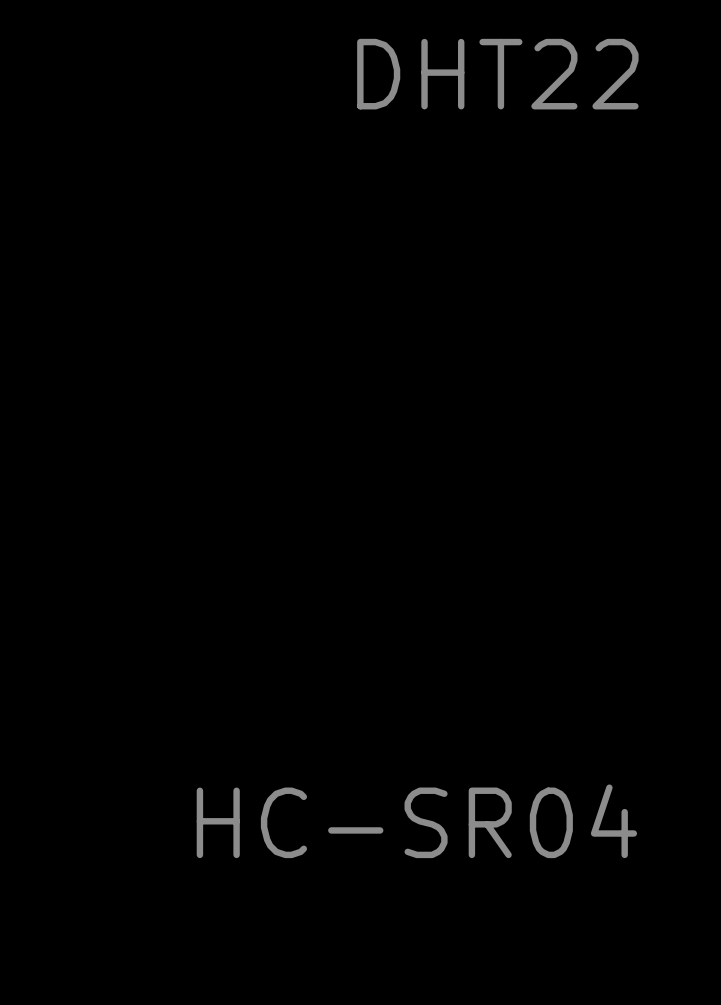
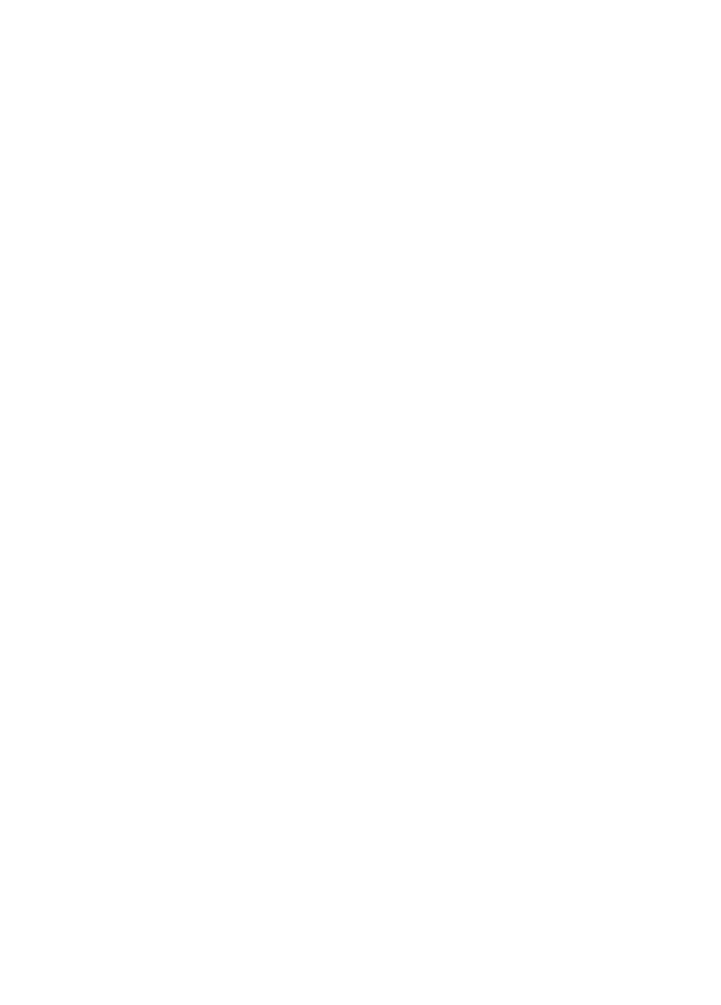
text: DHT22 (497, 74) -> none
text: HC-SR04 (416, 821) -> none

